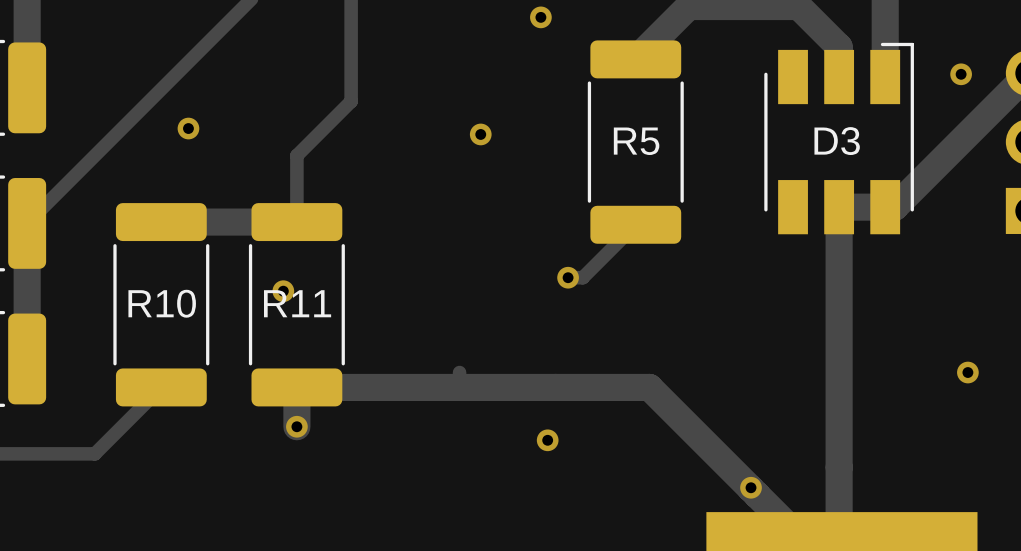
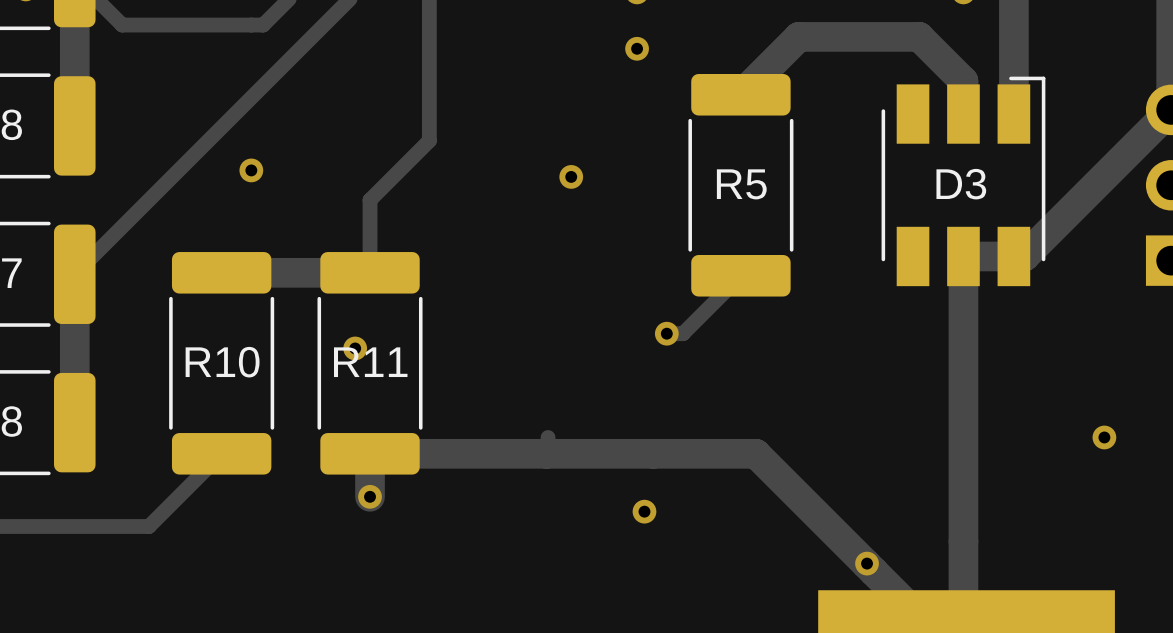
via: (961, 74) -> none

